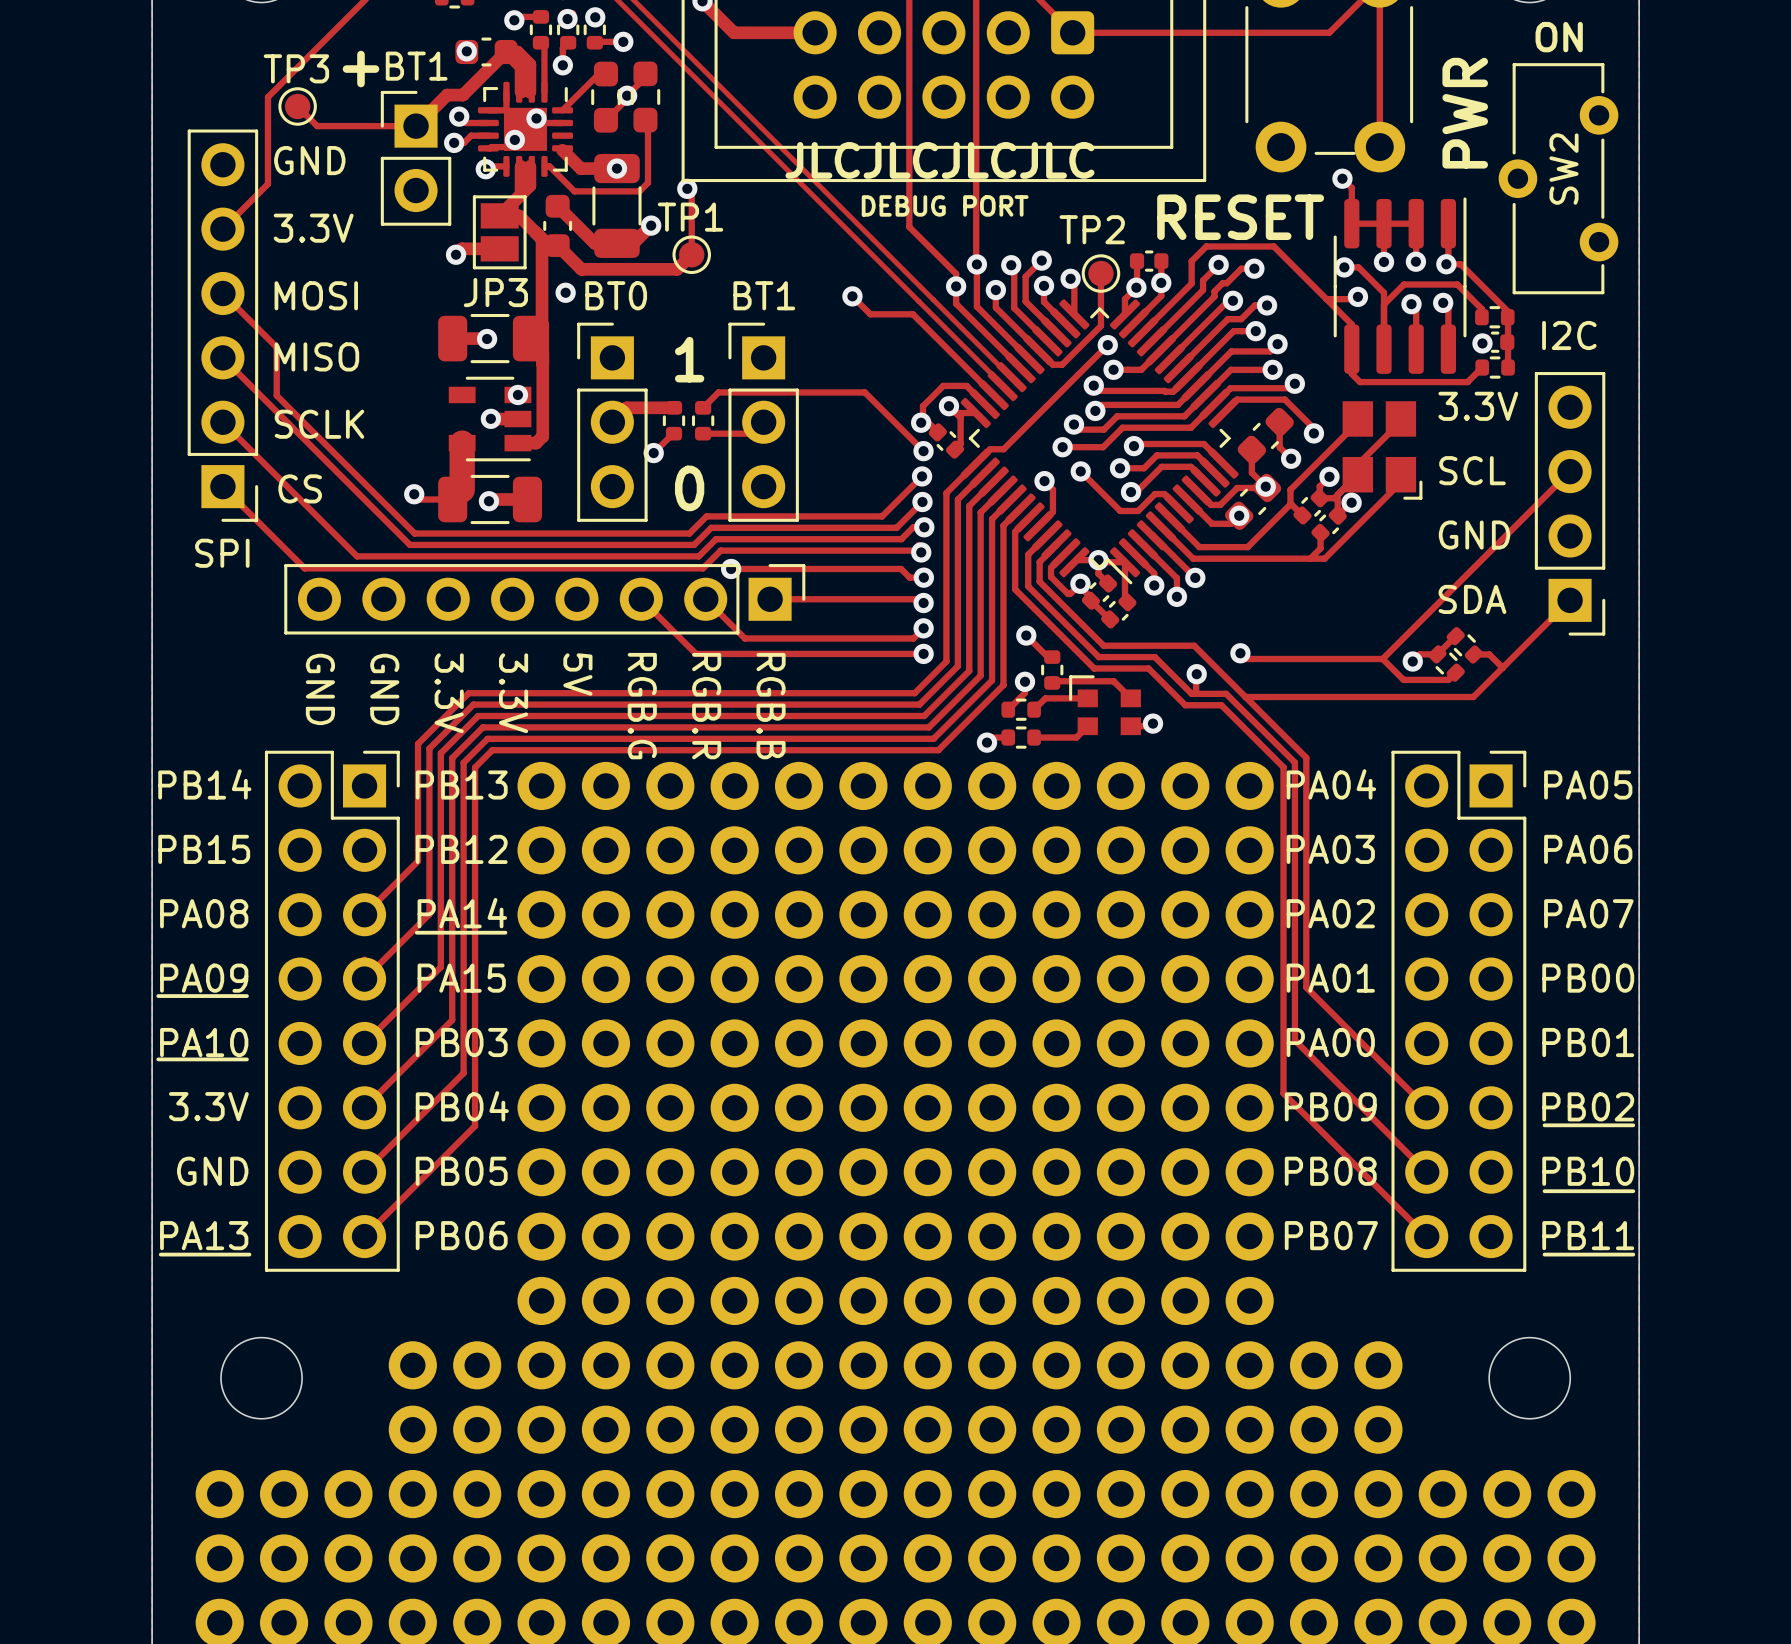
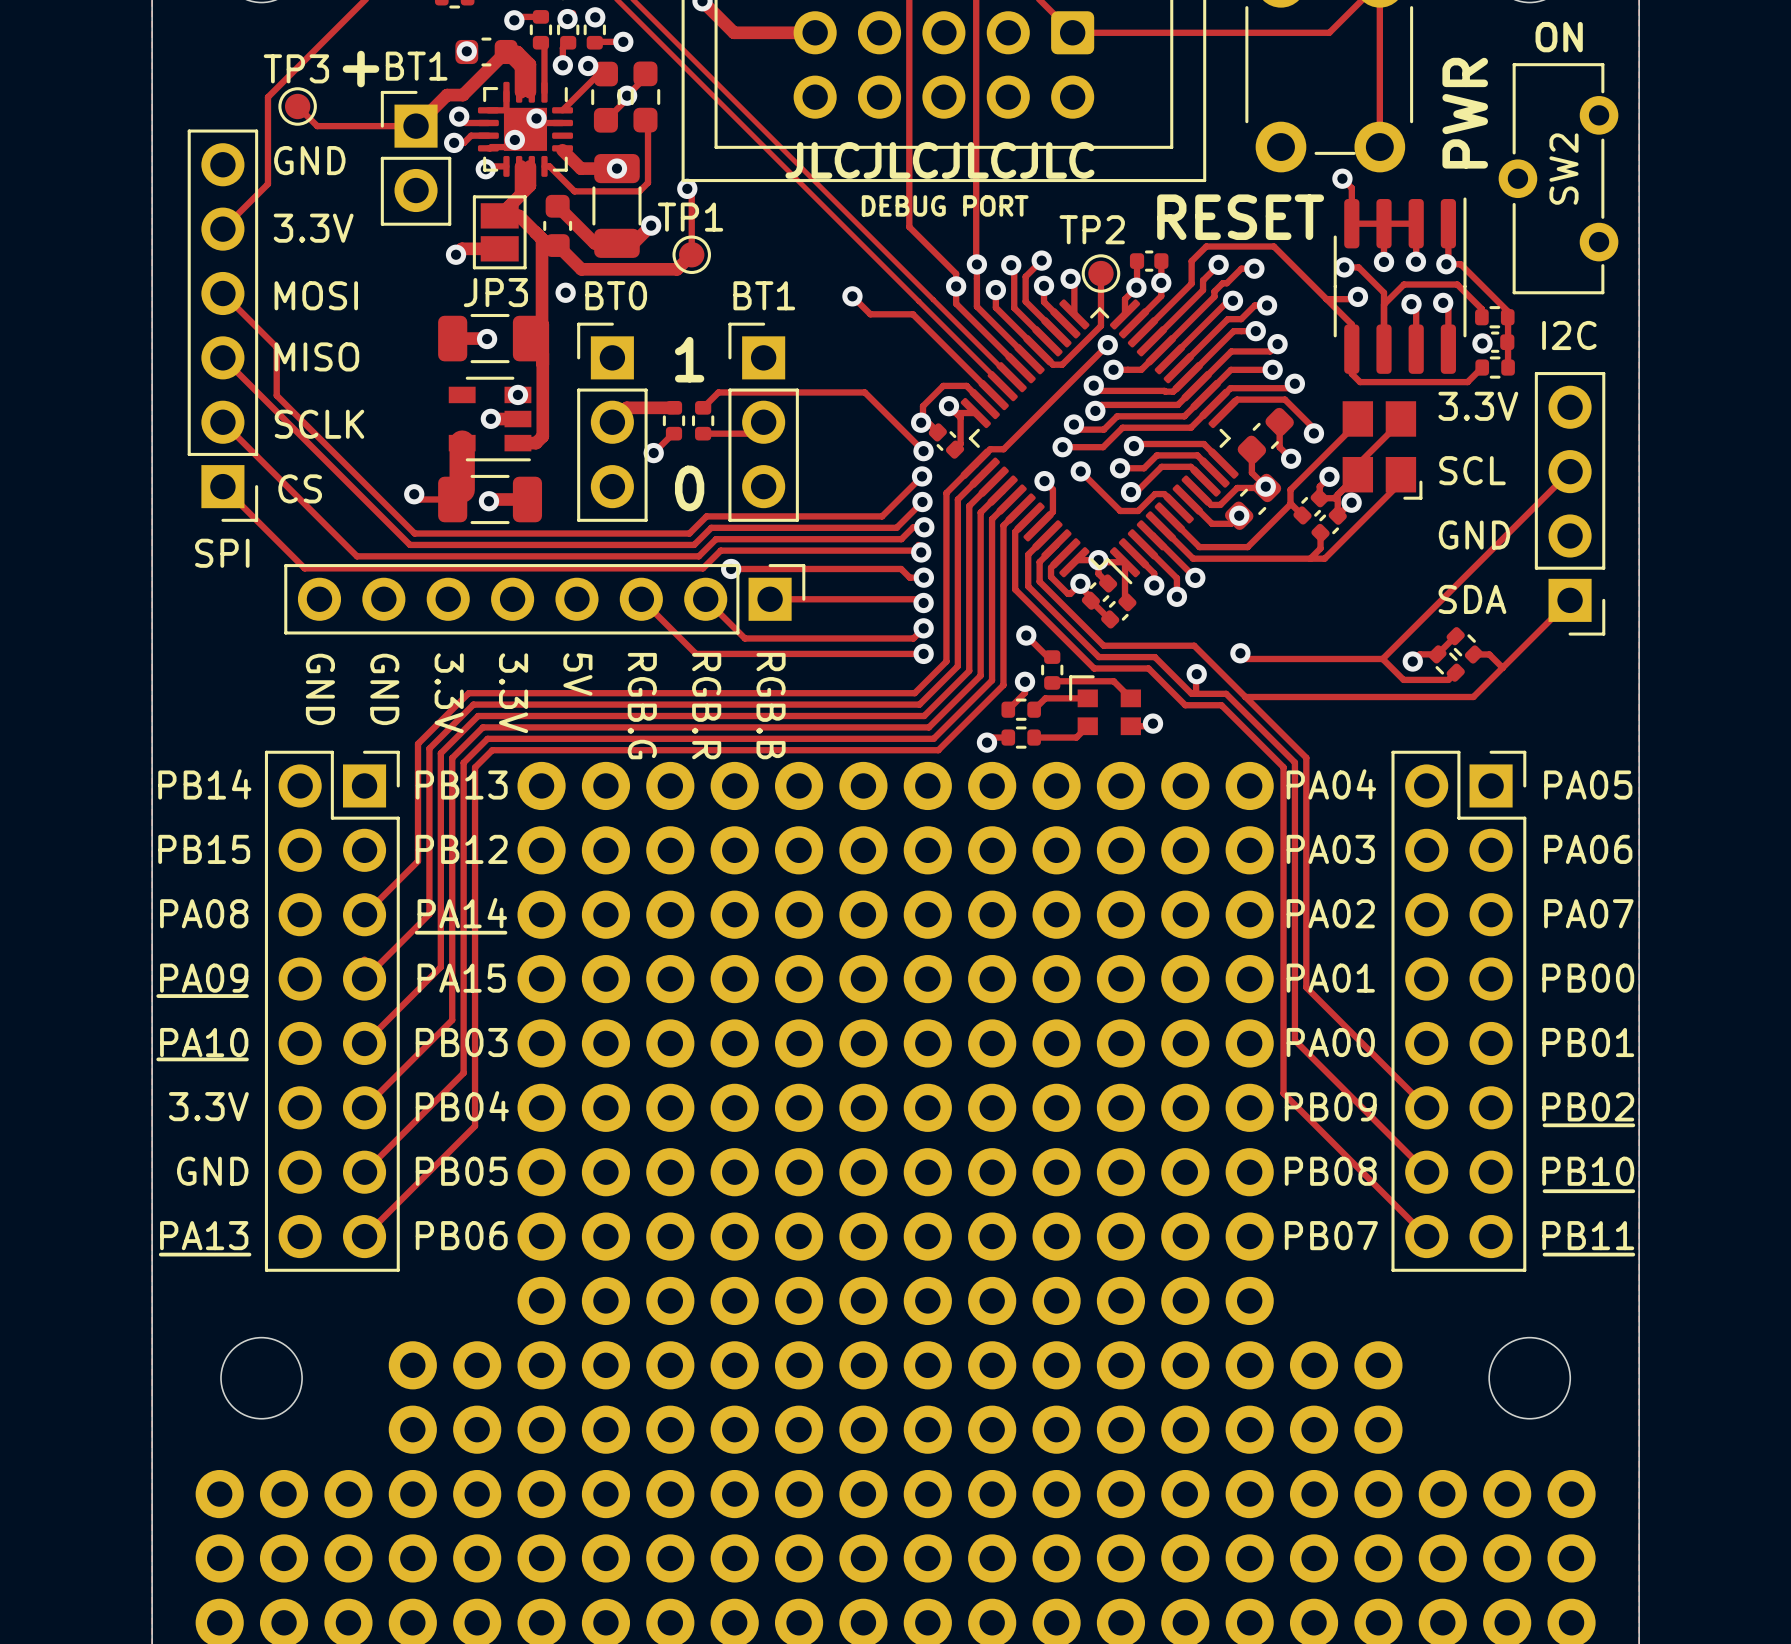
via: none -> (588, 65)

